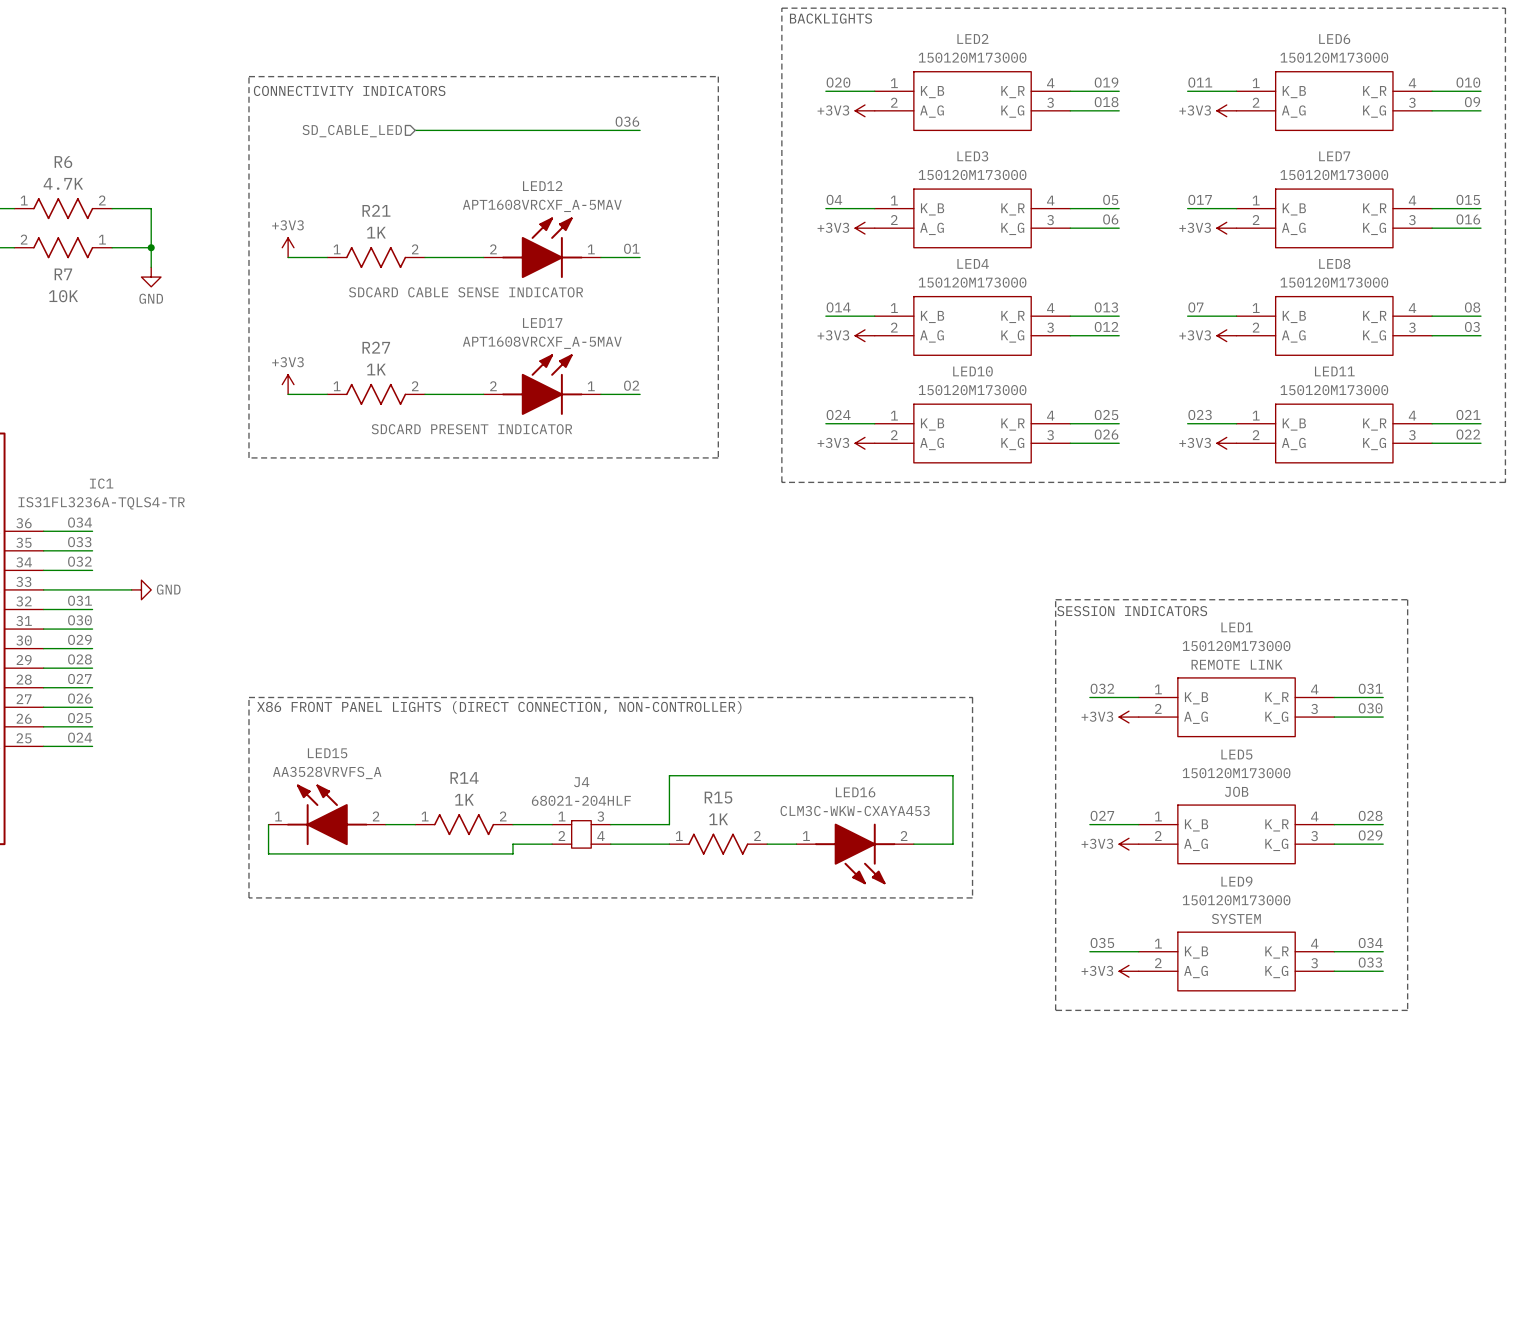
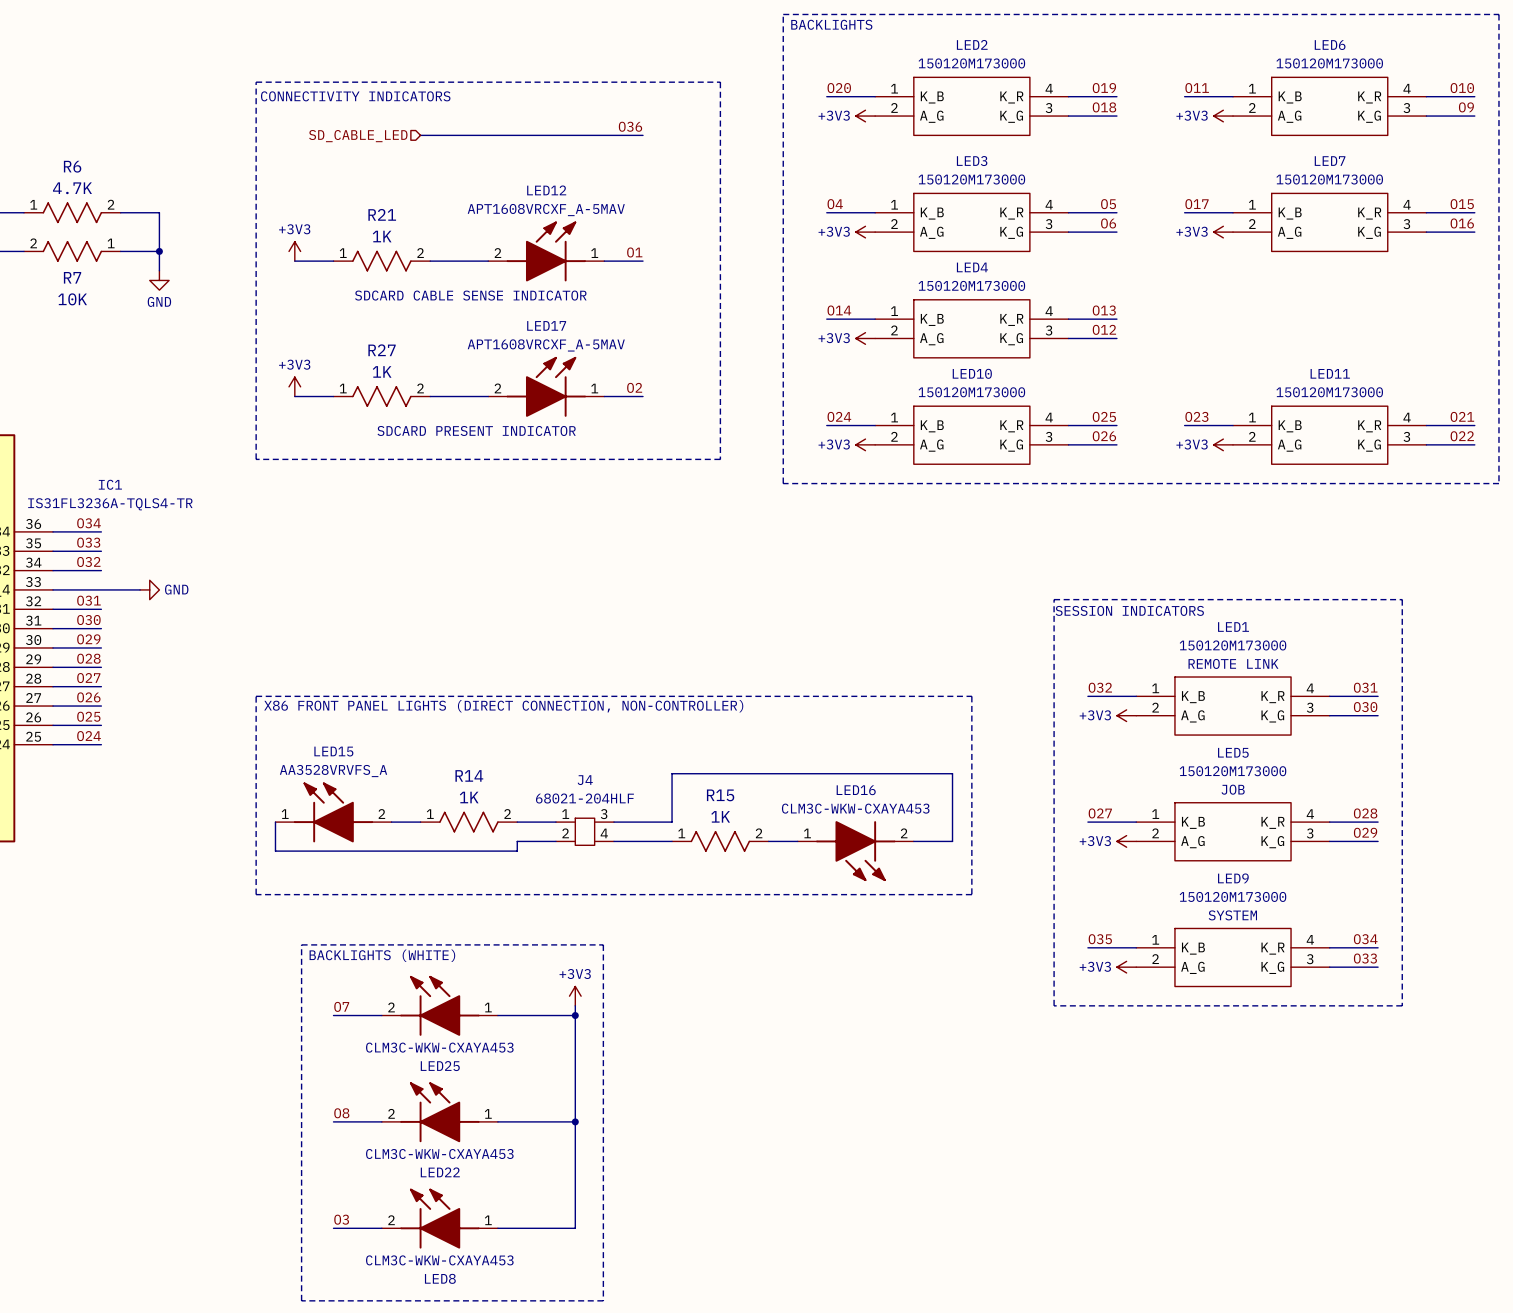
LED8 name position: LED8 (1334, 263) -> LED8 (440, 1278)
LED8 value: 150120M173000 (1334, 282) -> CLM3C-WKW-CXAYA453 (439, 1260)
LED8 symbol: [1236, 296, 1433, 356] -> [381, 1188, 498, 1249]
label: O7 (1195, 307) -> none
label: O8 (1472, 307) -> none
wire: (1187, 316) (1236, 316) -> none
wire: (1432, 316) (1480, 316) -> none
label: O3 (1472, 327) -> none
power symbol: +3V3 (1226, 335) -> none
wire: (1432, 335) (1480, 335) -> none
line: none -> (301, 944) (603, 944) (603, 1300) (301, 1300) (301, 944)
text: none -> BACKLIGHTS (WHITE) (382, 955)
power symbol: none -> +3V3 (575, 996)
LED25: none -> CLM3C-WKW-CXAYA453 (439, 1005)
wire: none -> (575, 1005) (575, 1228) (497, 1228)
label: none -> O7 (341, 1006)
wire: none -> (333, 1015) (381, 1015)
wire: none -> (497, 1015) (575, 1015)
junction: none -> (575, 1015)
LED22: none -> CLM3C-WKW-CXAYA453 (439, 1112)
label: none -> O8 (341, 1113)
wire: none -> (333, 1121) (381, 1121)
wire: none -> (497, 1121) (575, 1121)
junction: none -> (575, 1121)
label: none -> O3 (341, 1219)
wire: none -> (333, 1228) (381, 1228)

